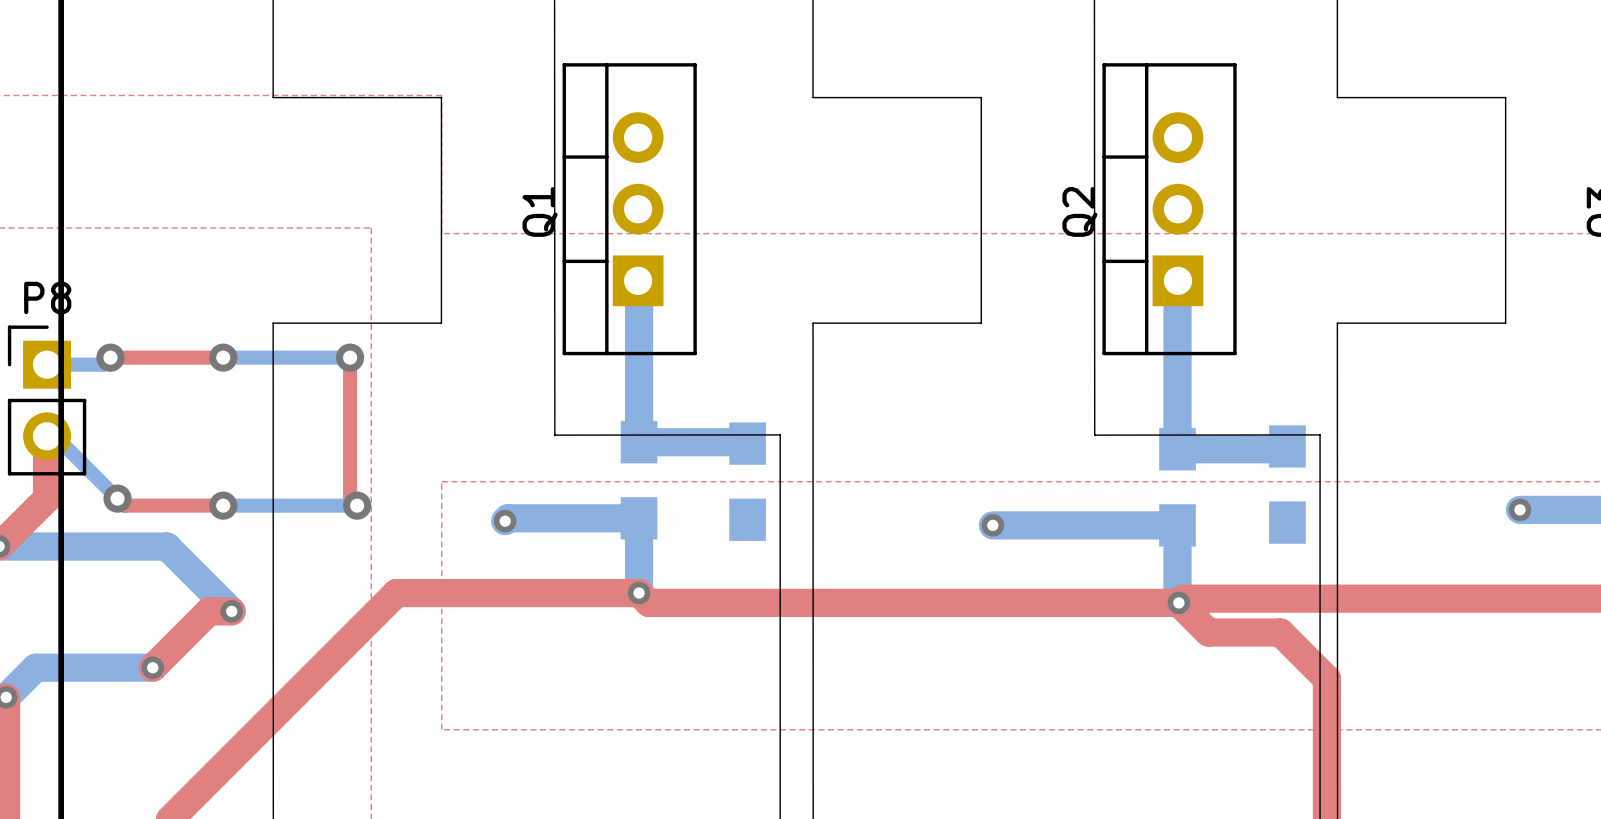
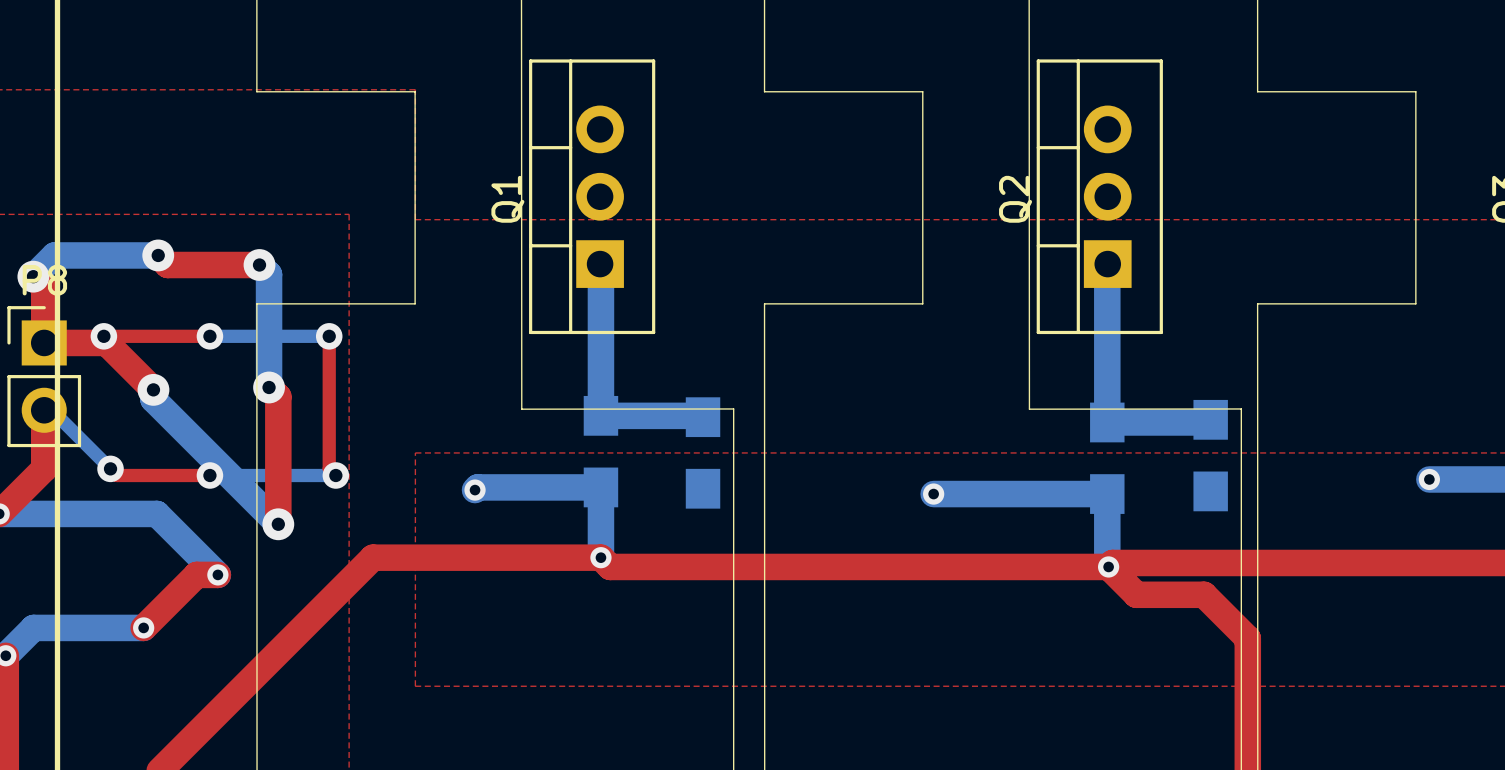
top track: none -> (158, 255) (167, 265) (259, 265)
bottom track: none -> (158, 255) (54, 255) (33, 276)
via: none -> (158, 255)
bottom track: none -> (259, 265) (269, 274) (269, 387)
via: none -> (259, 265)
top track: none -> (33, 276) (44, 287) (44, 342) (106, 342) (153, 389)
via: none -> (33, 276)
top track: none -> (269, 387) (278, 396) (278, 524)
via: none -> (269, 387)
bottom track: none -> (153, 389) (153, 399) (278, 524)
via: none -> (153, 389)
via: none -> (278, 524)

